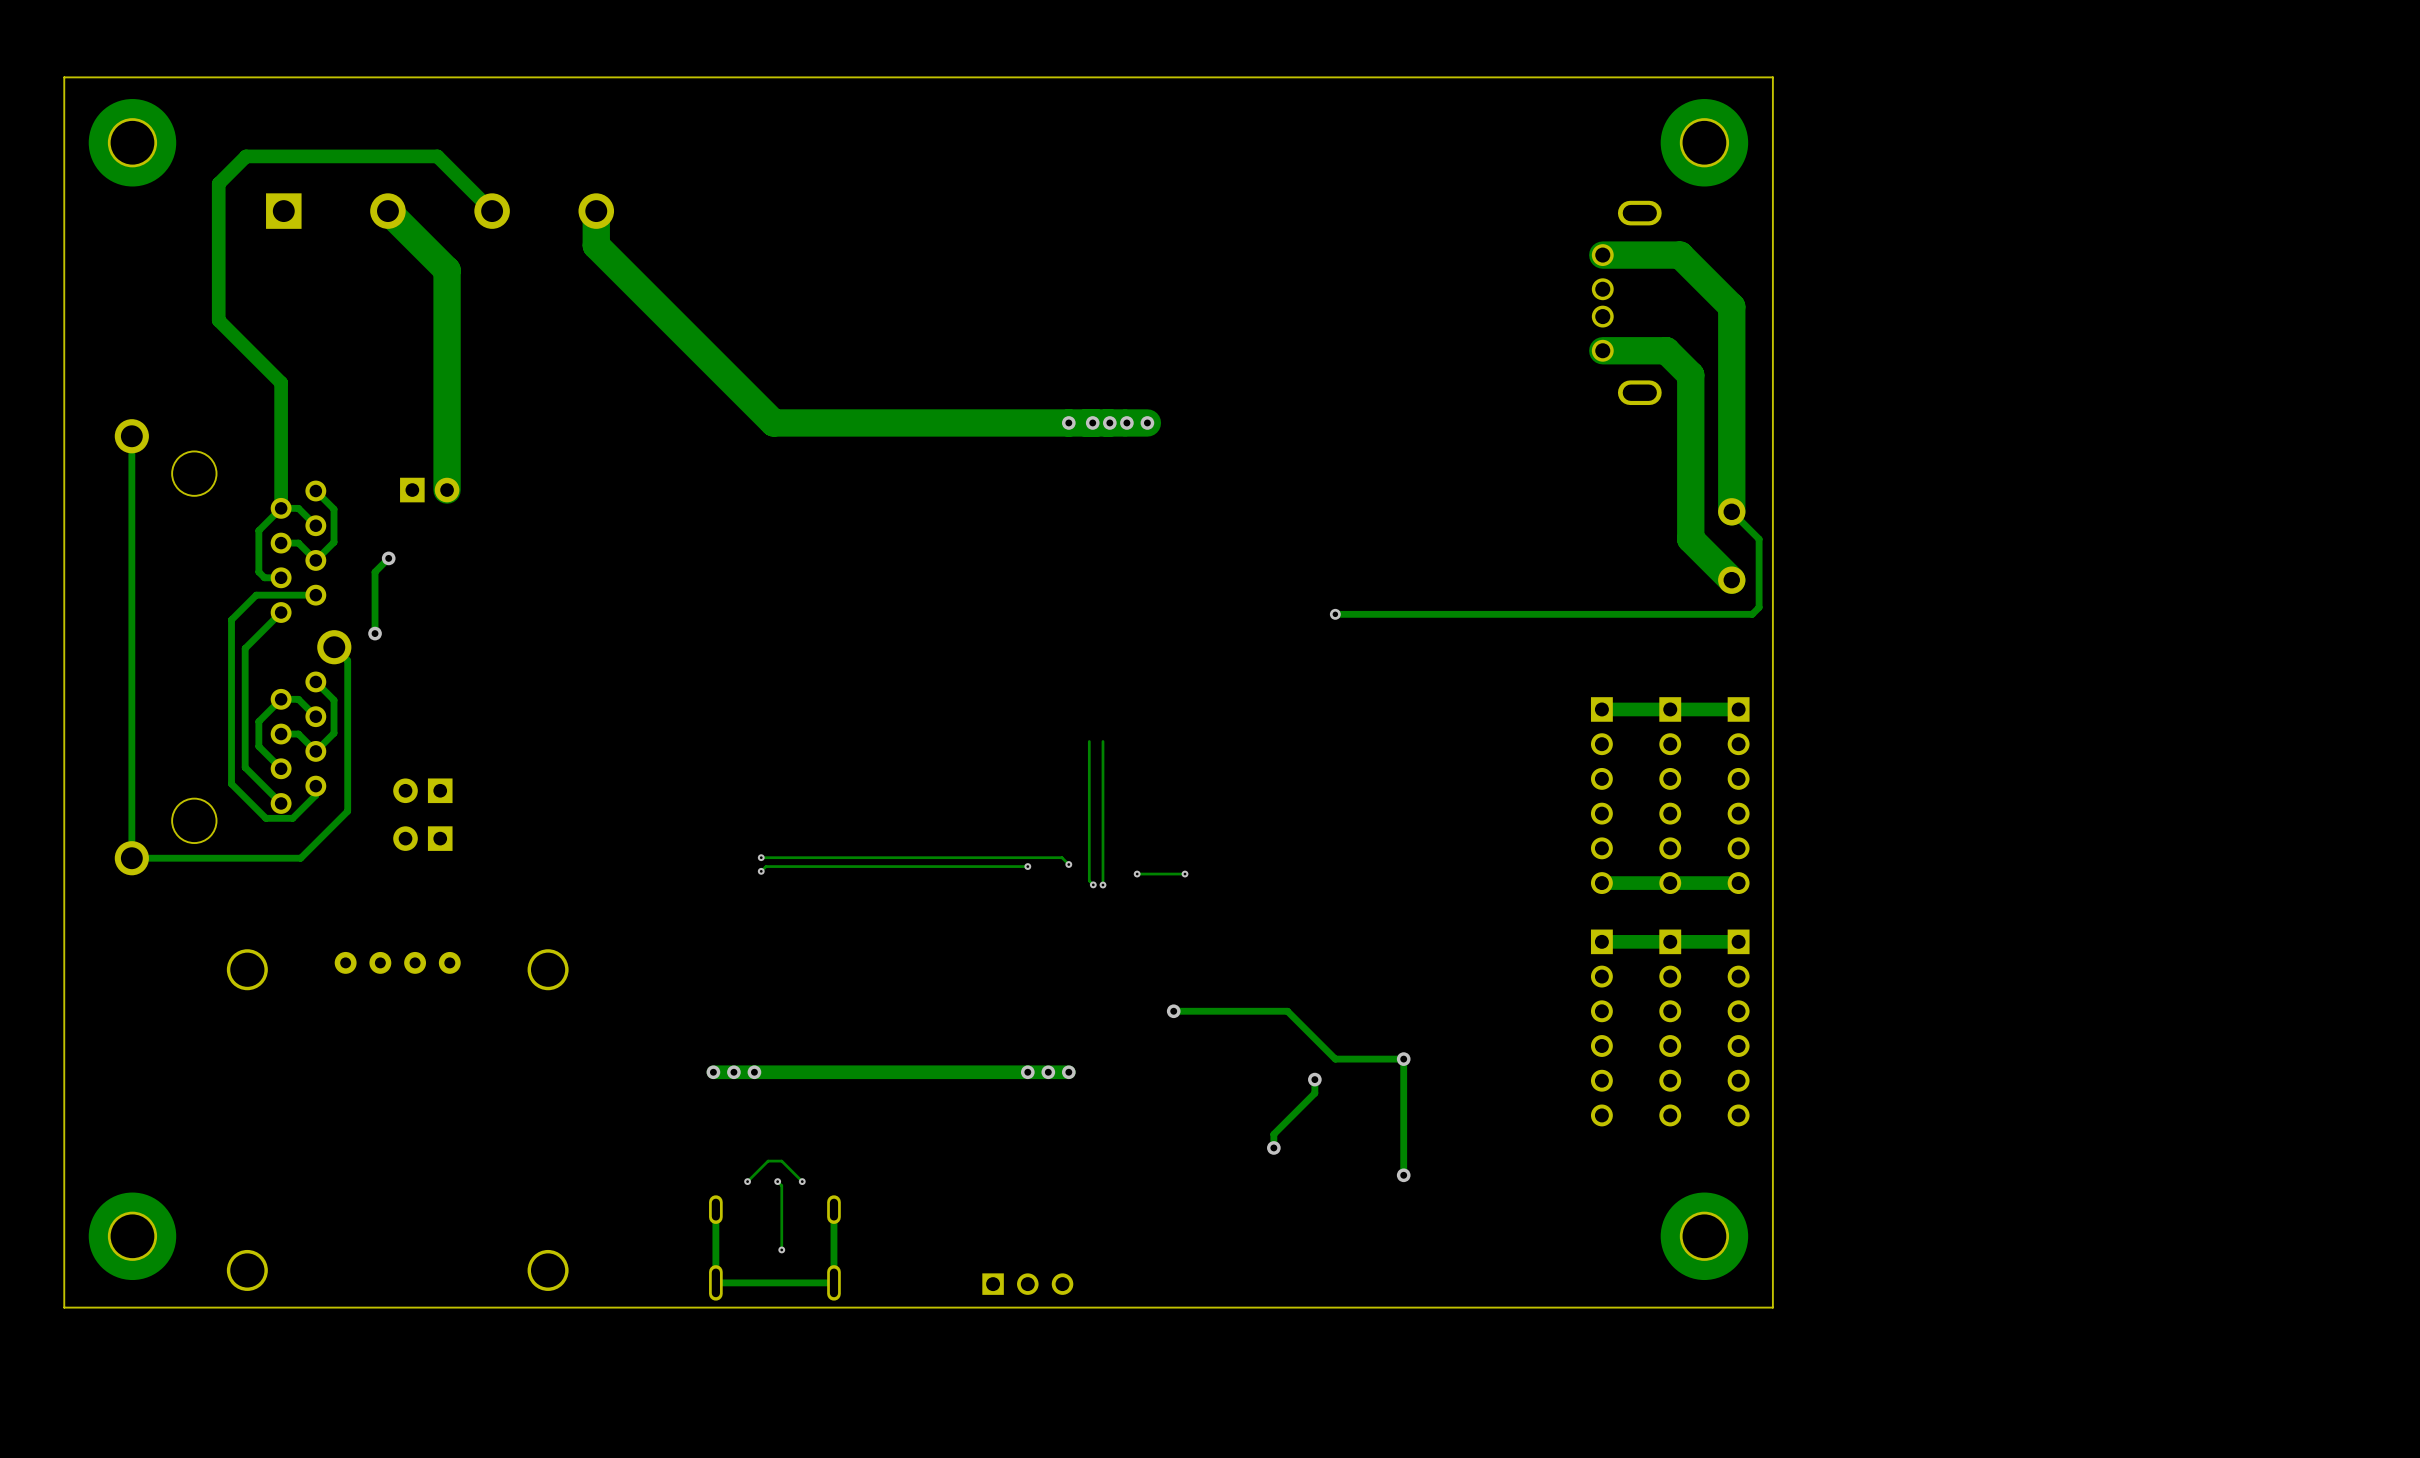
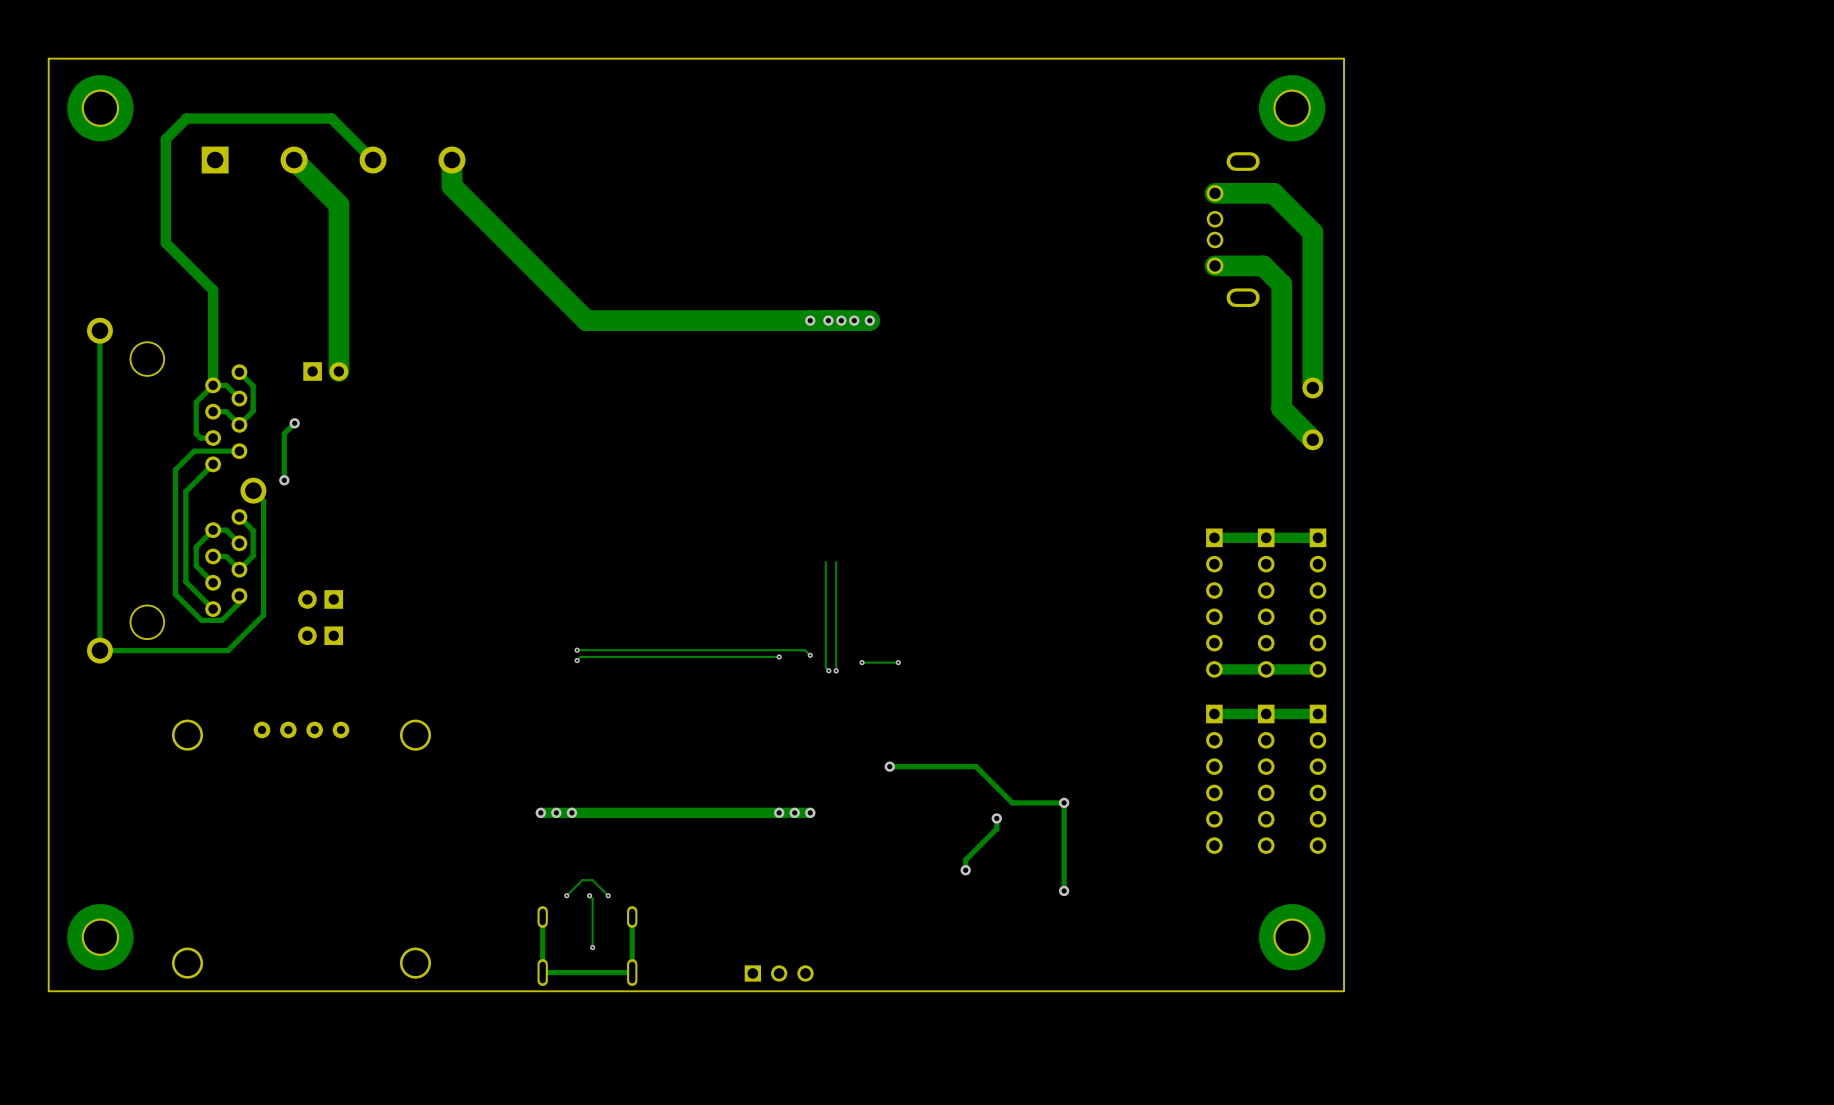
track: (1731, 511) (1759, 539) (1759, 607) (1752, 614) (1335, 614) -> none
via: (1335, 614) -> none

